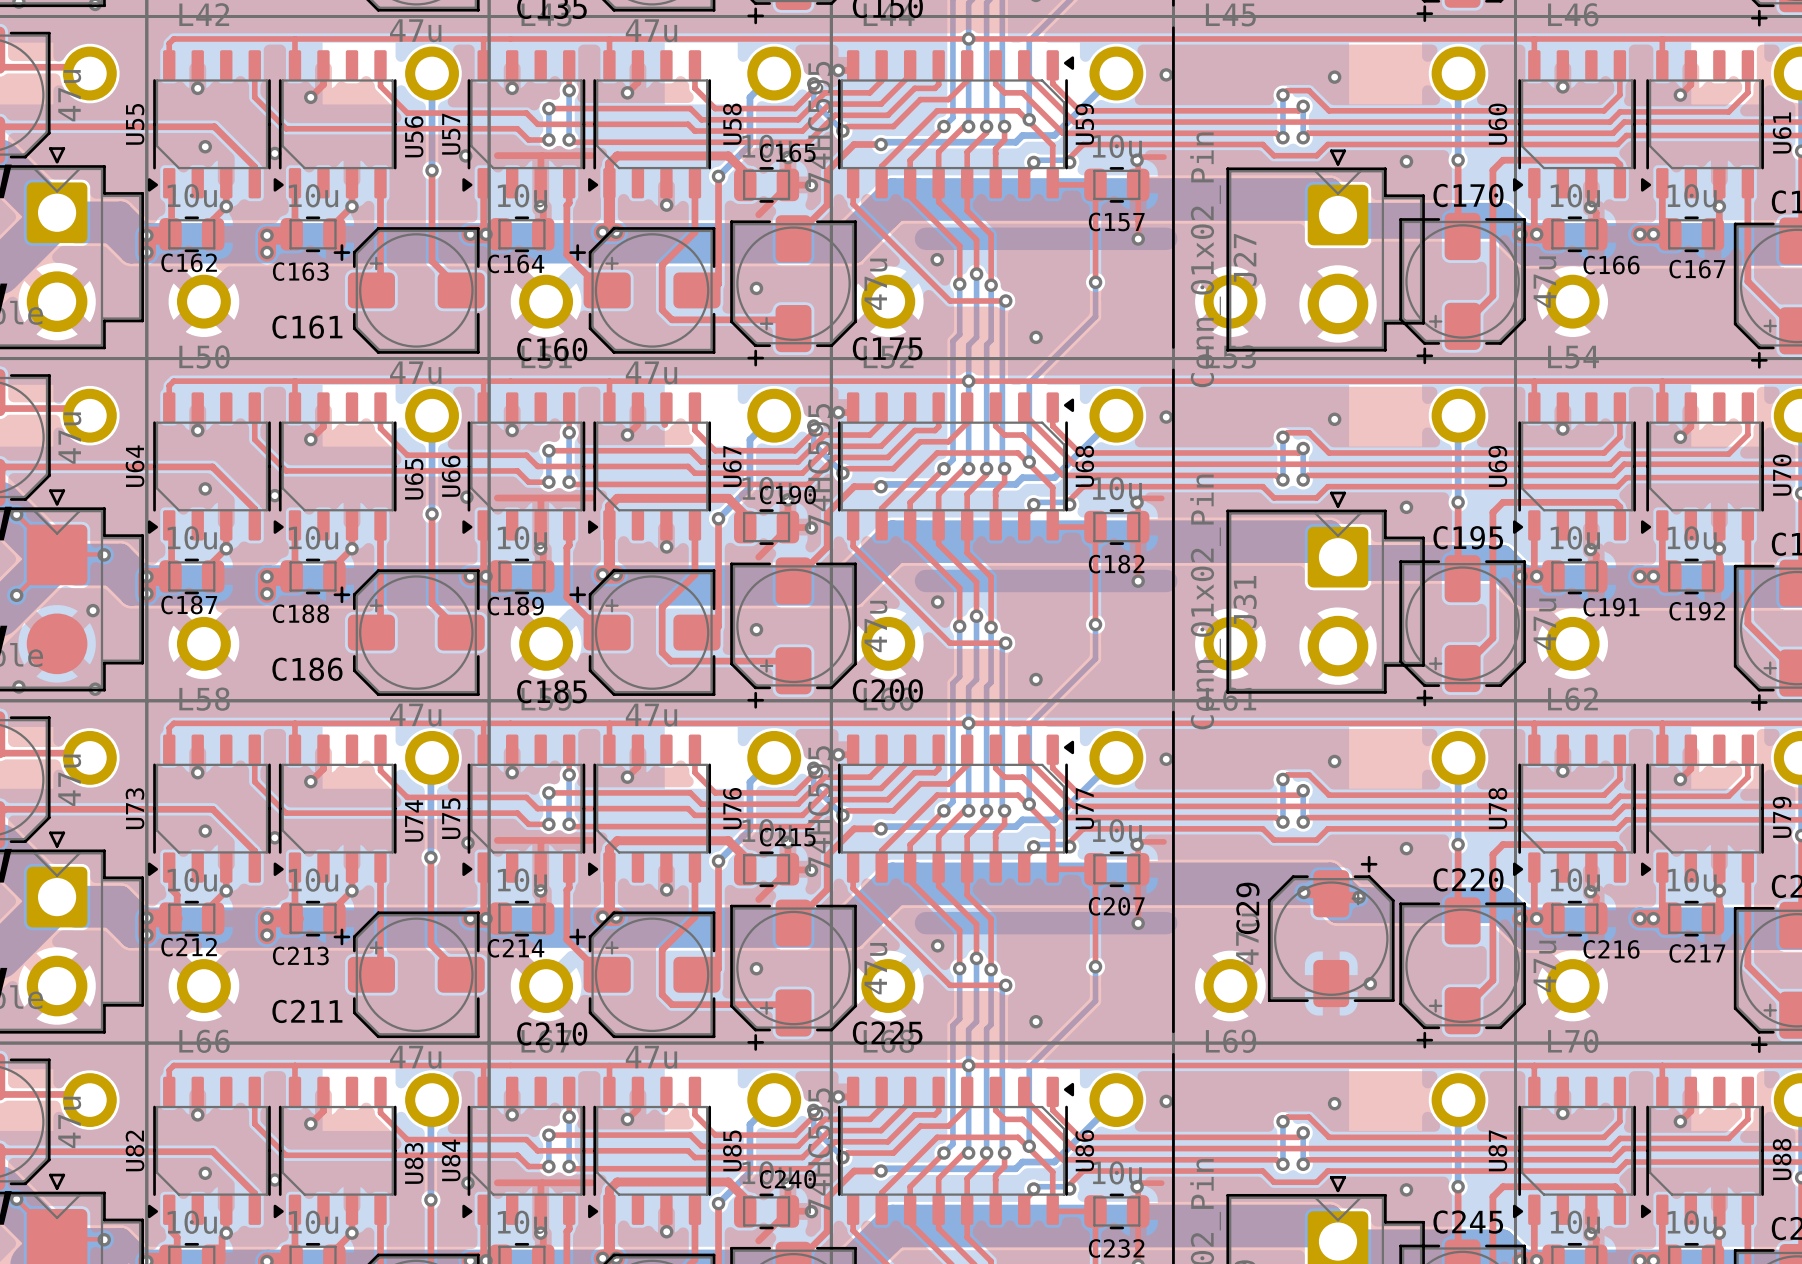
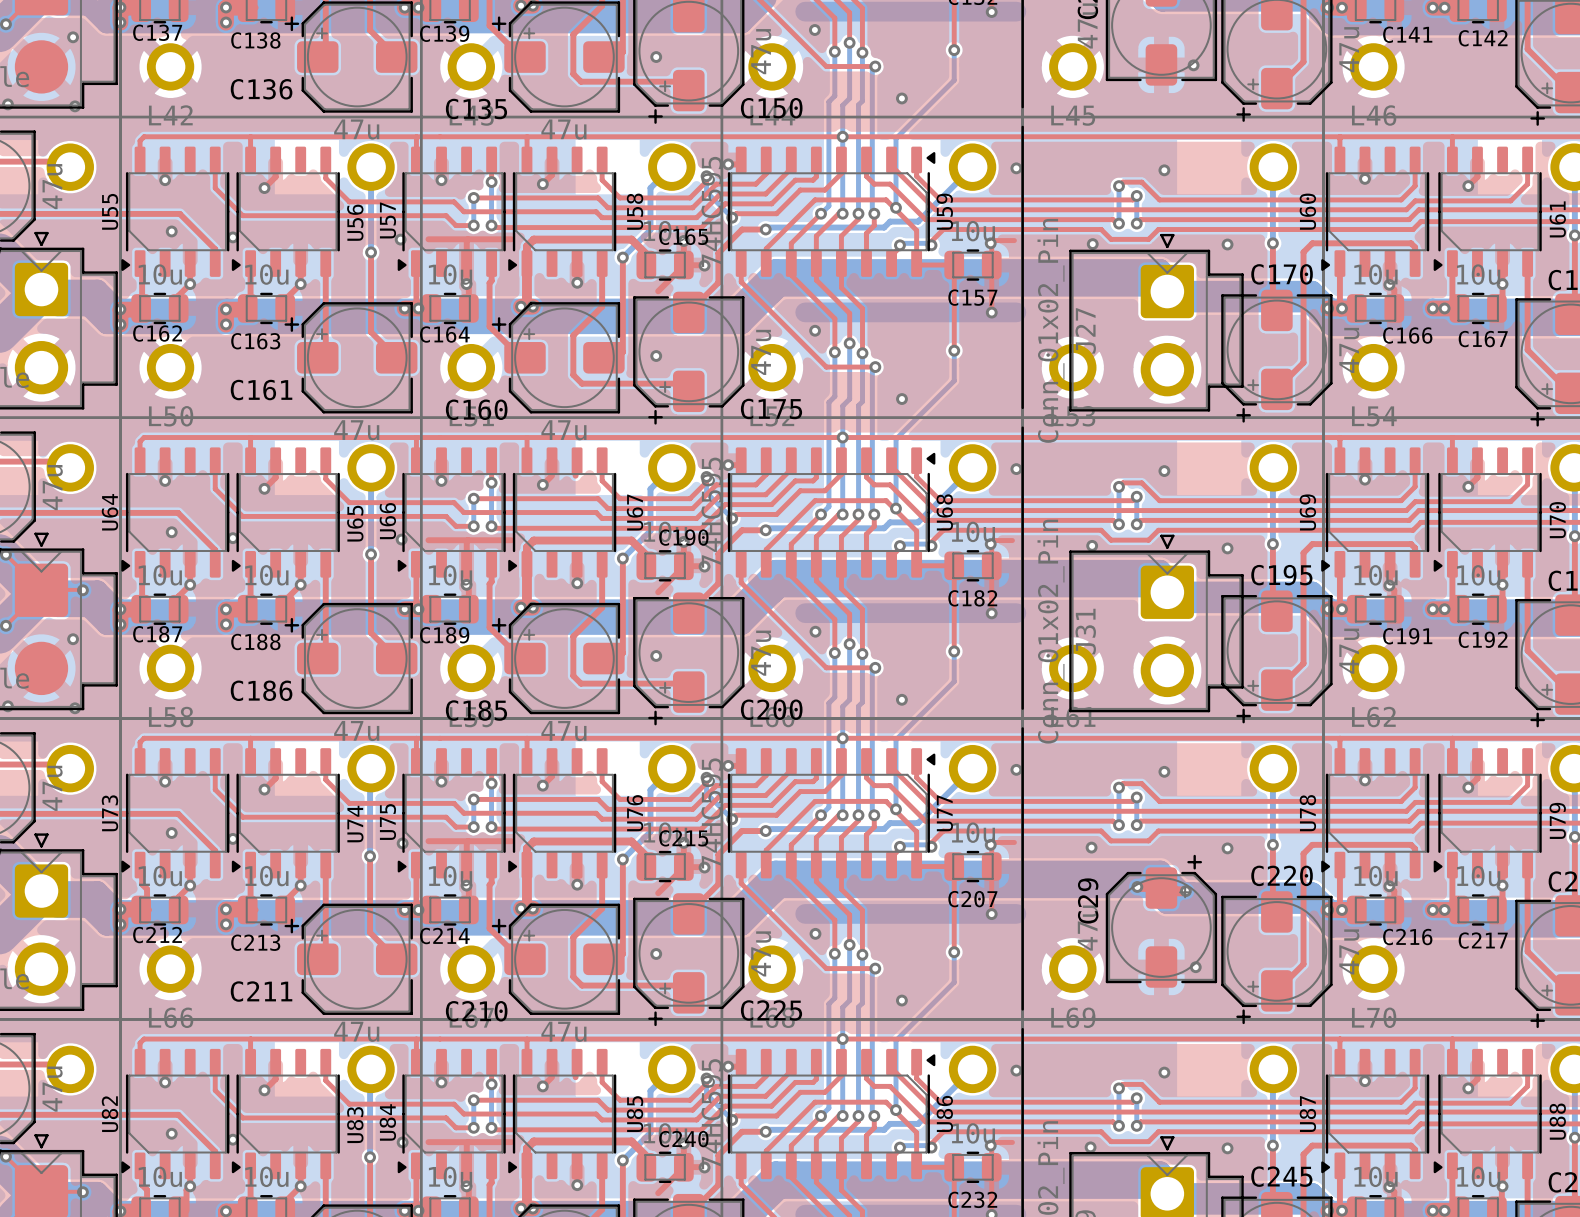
via: none -> (1092, 244)
via: none -> (1092, 545)
via: none -> (1091, 847)
via: none -> (1090, 1147)

